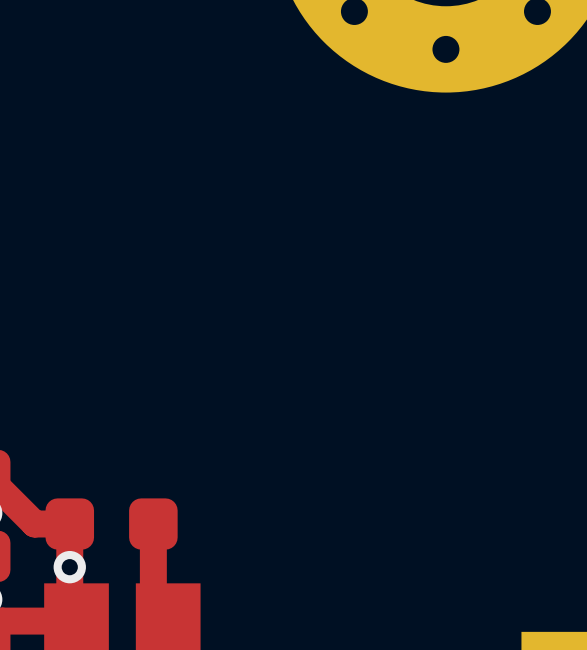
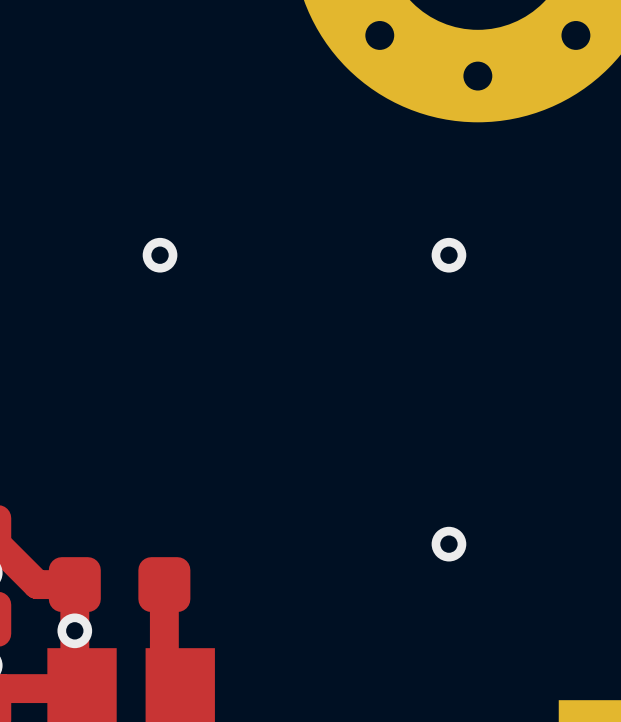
via: none -> (160, 255)
via: none -> (448, 255)
via: none -> (448, 544)

